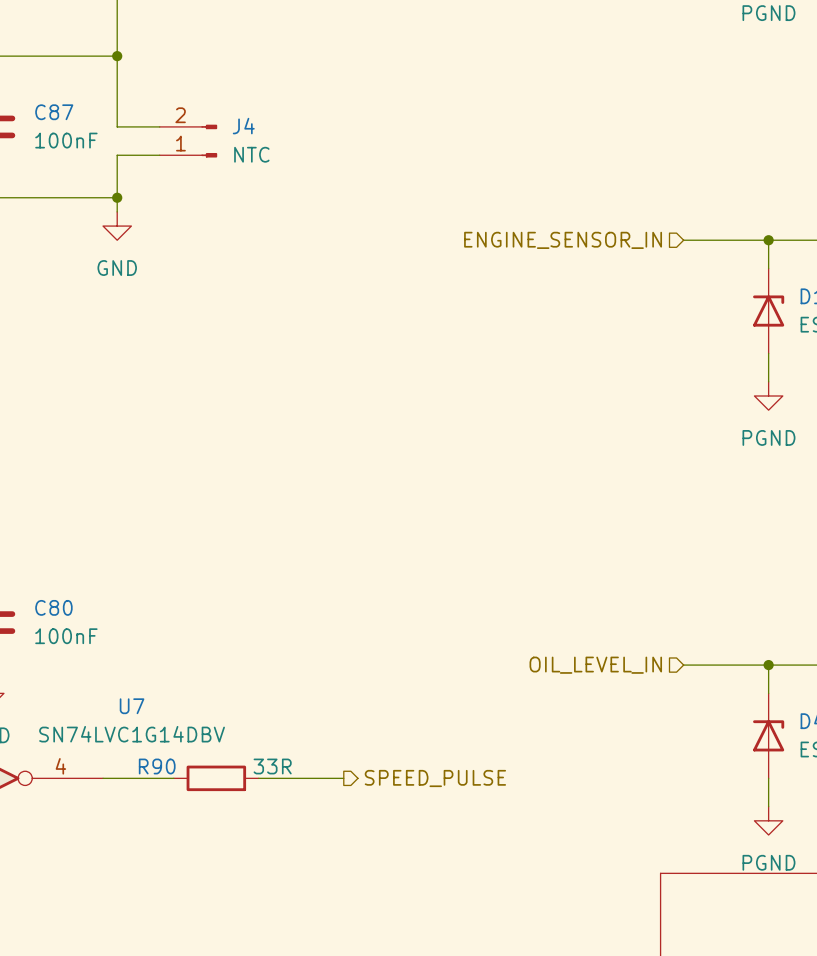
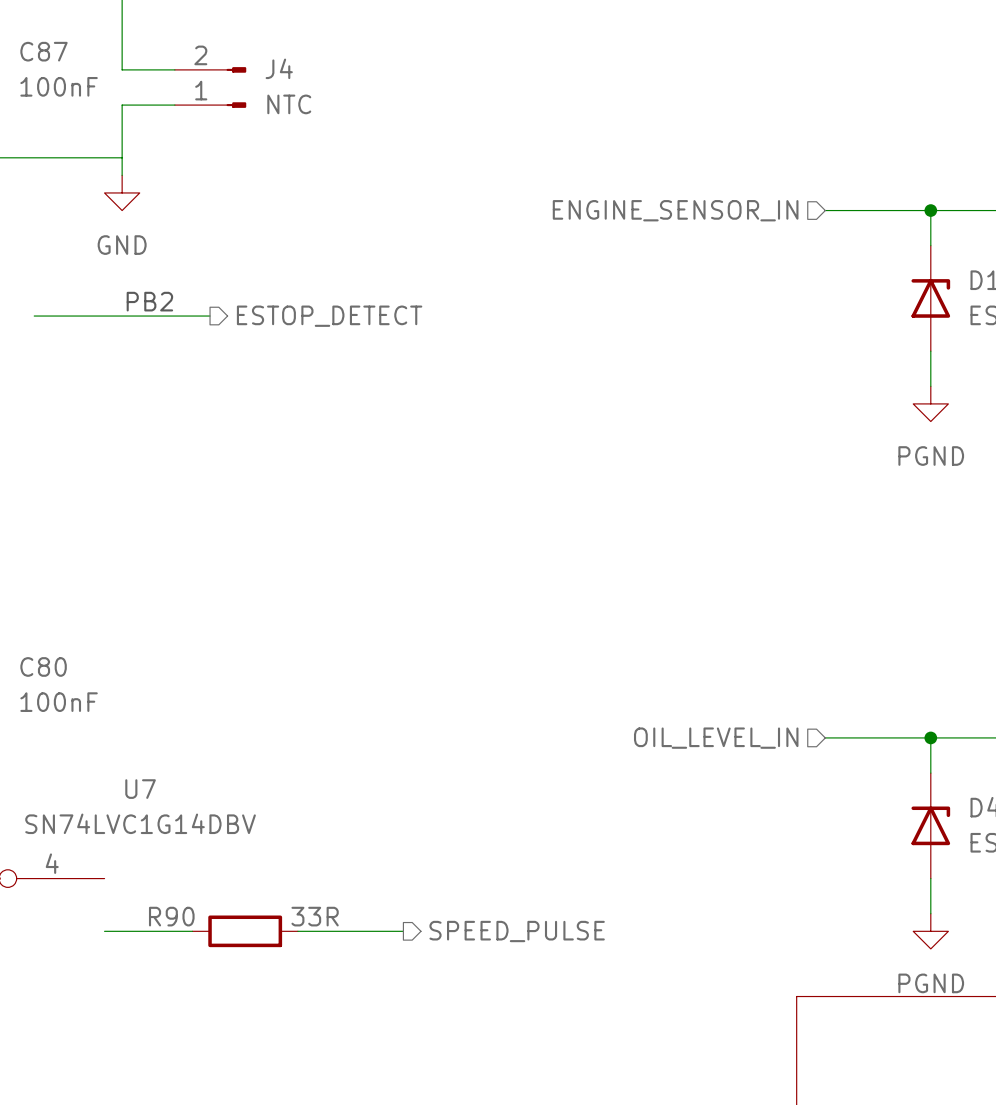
junction: (117, 197) -> none
text: none -> PB2 (149, 301)
wire: none -> (34, 316) (210, 316)
hierarchical label: none -> ESTOP_DETECT (329, 316)
wire: (103, 778) (173, 778) -> (104, 931) (192, 931)
R90 position: (216, 778) -> (245, 931)
wire: (258, 778) (343, 778) -> (297, 931) (403, 931)
hierarchical label position: SPEED_PULSE (435, 778) -> SPEED_PULSE (517, 931)

